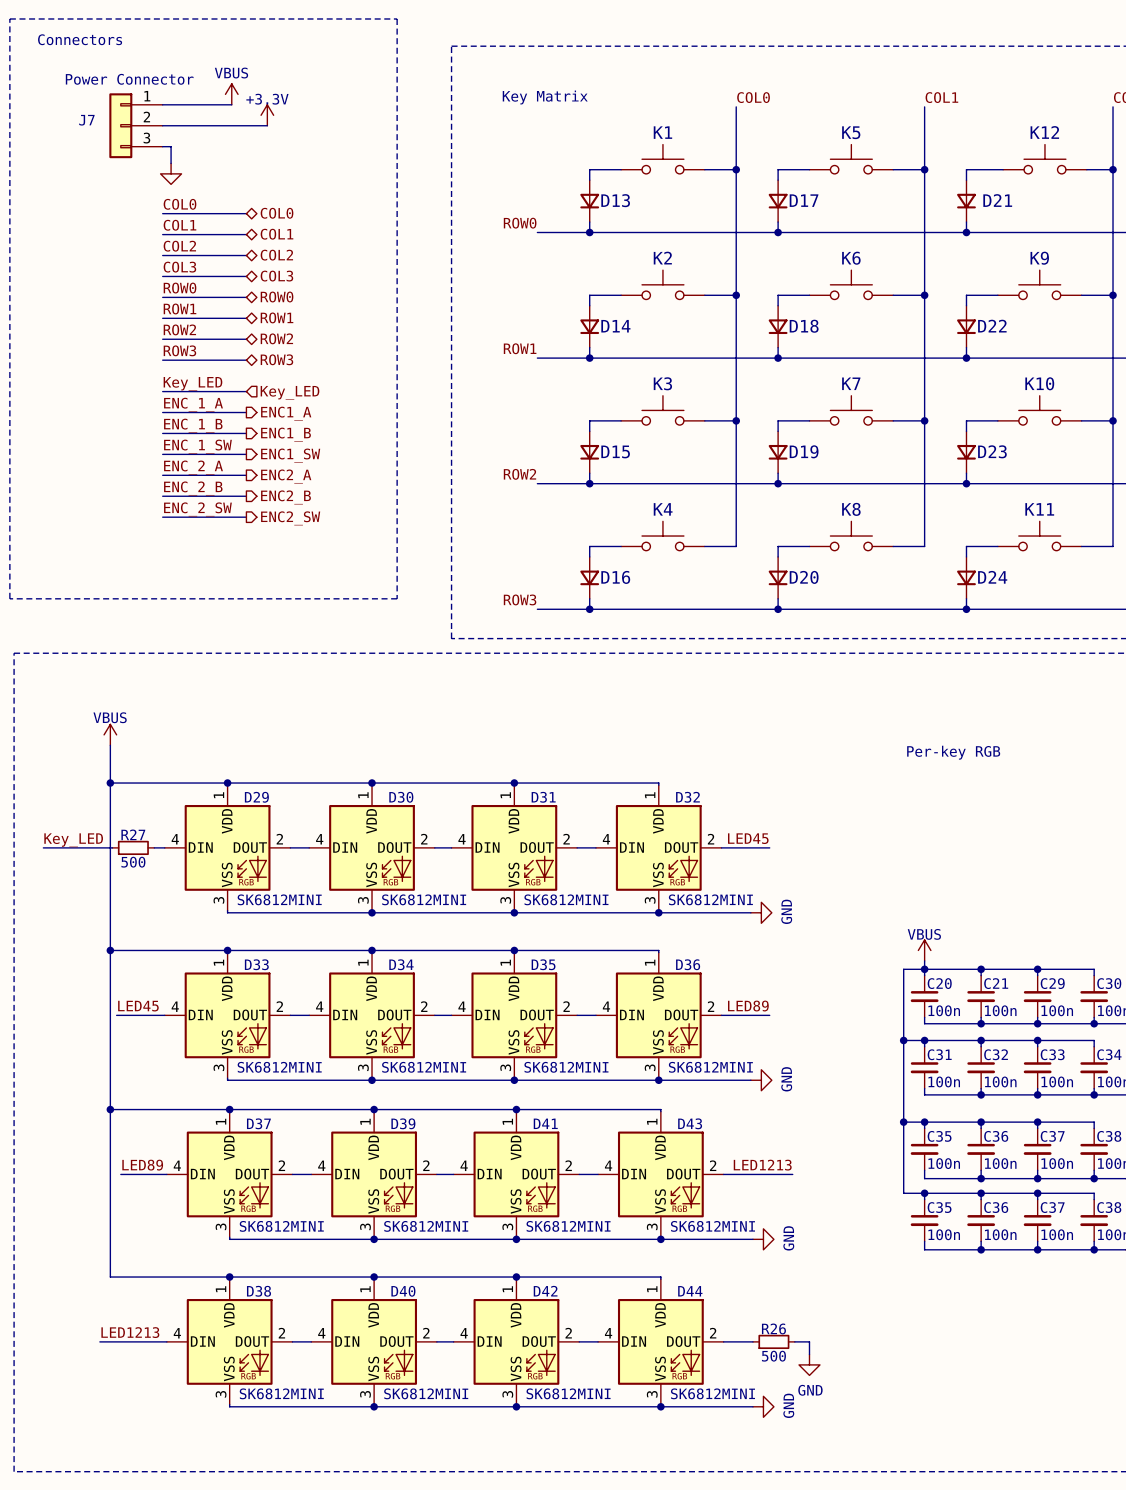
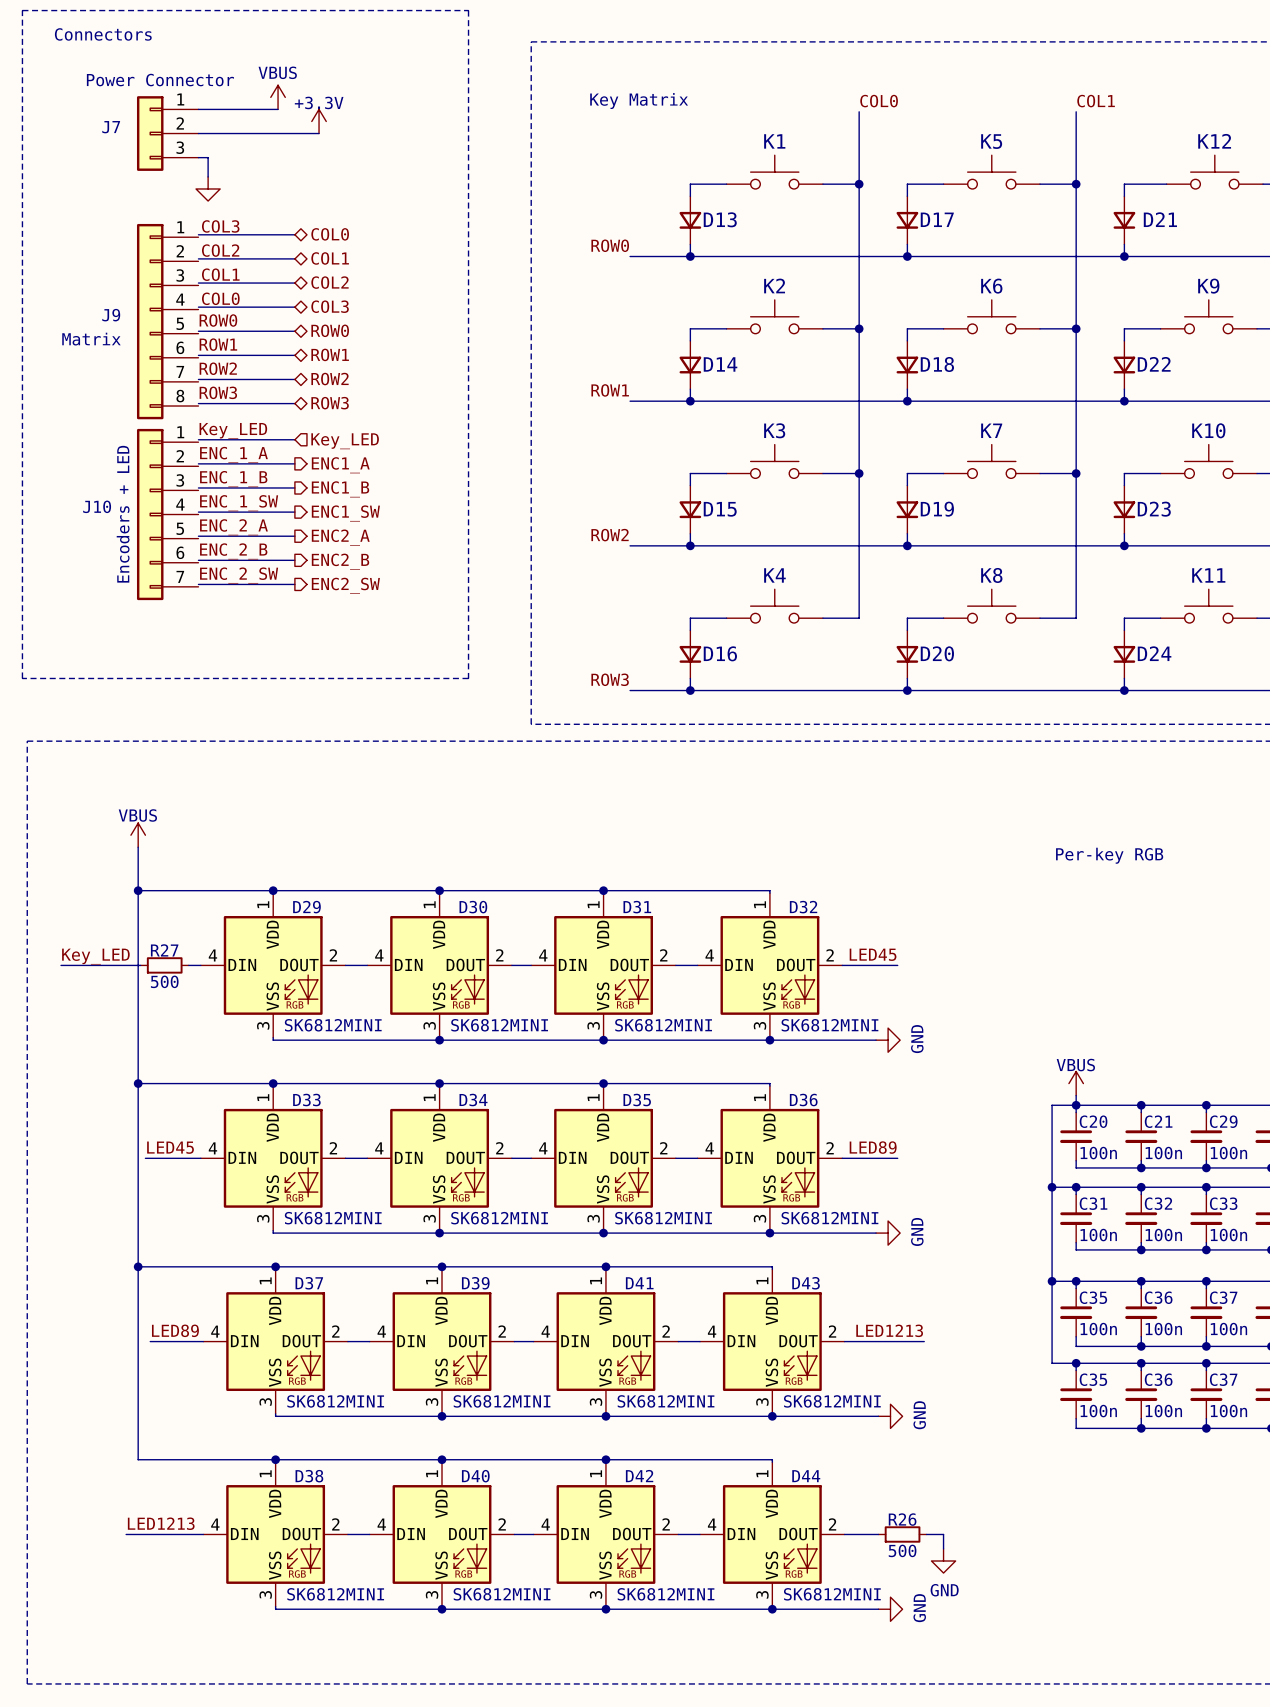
label: COL0 (179, 204) -> COL3 (220, 226)
label: COL1 (179, 225) -> COL2 (220, 250)
label: COL2 (179, 246) -> COL1 (220, 274)
label: COL3 (179, 267) -> COL0 (220, 298)
J9: none -> Matrix (167, 321)
J10: none -> Encoders + LED (167, 514)

